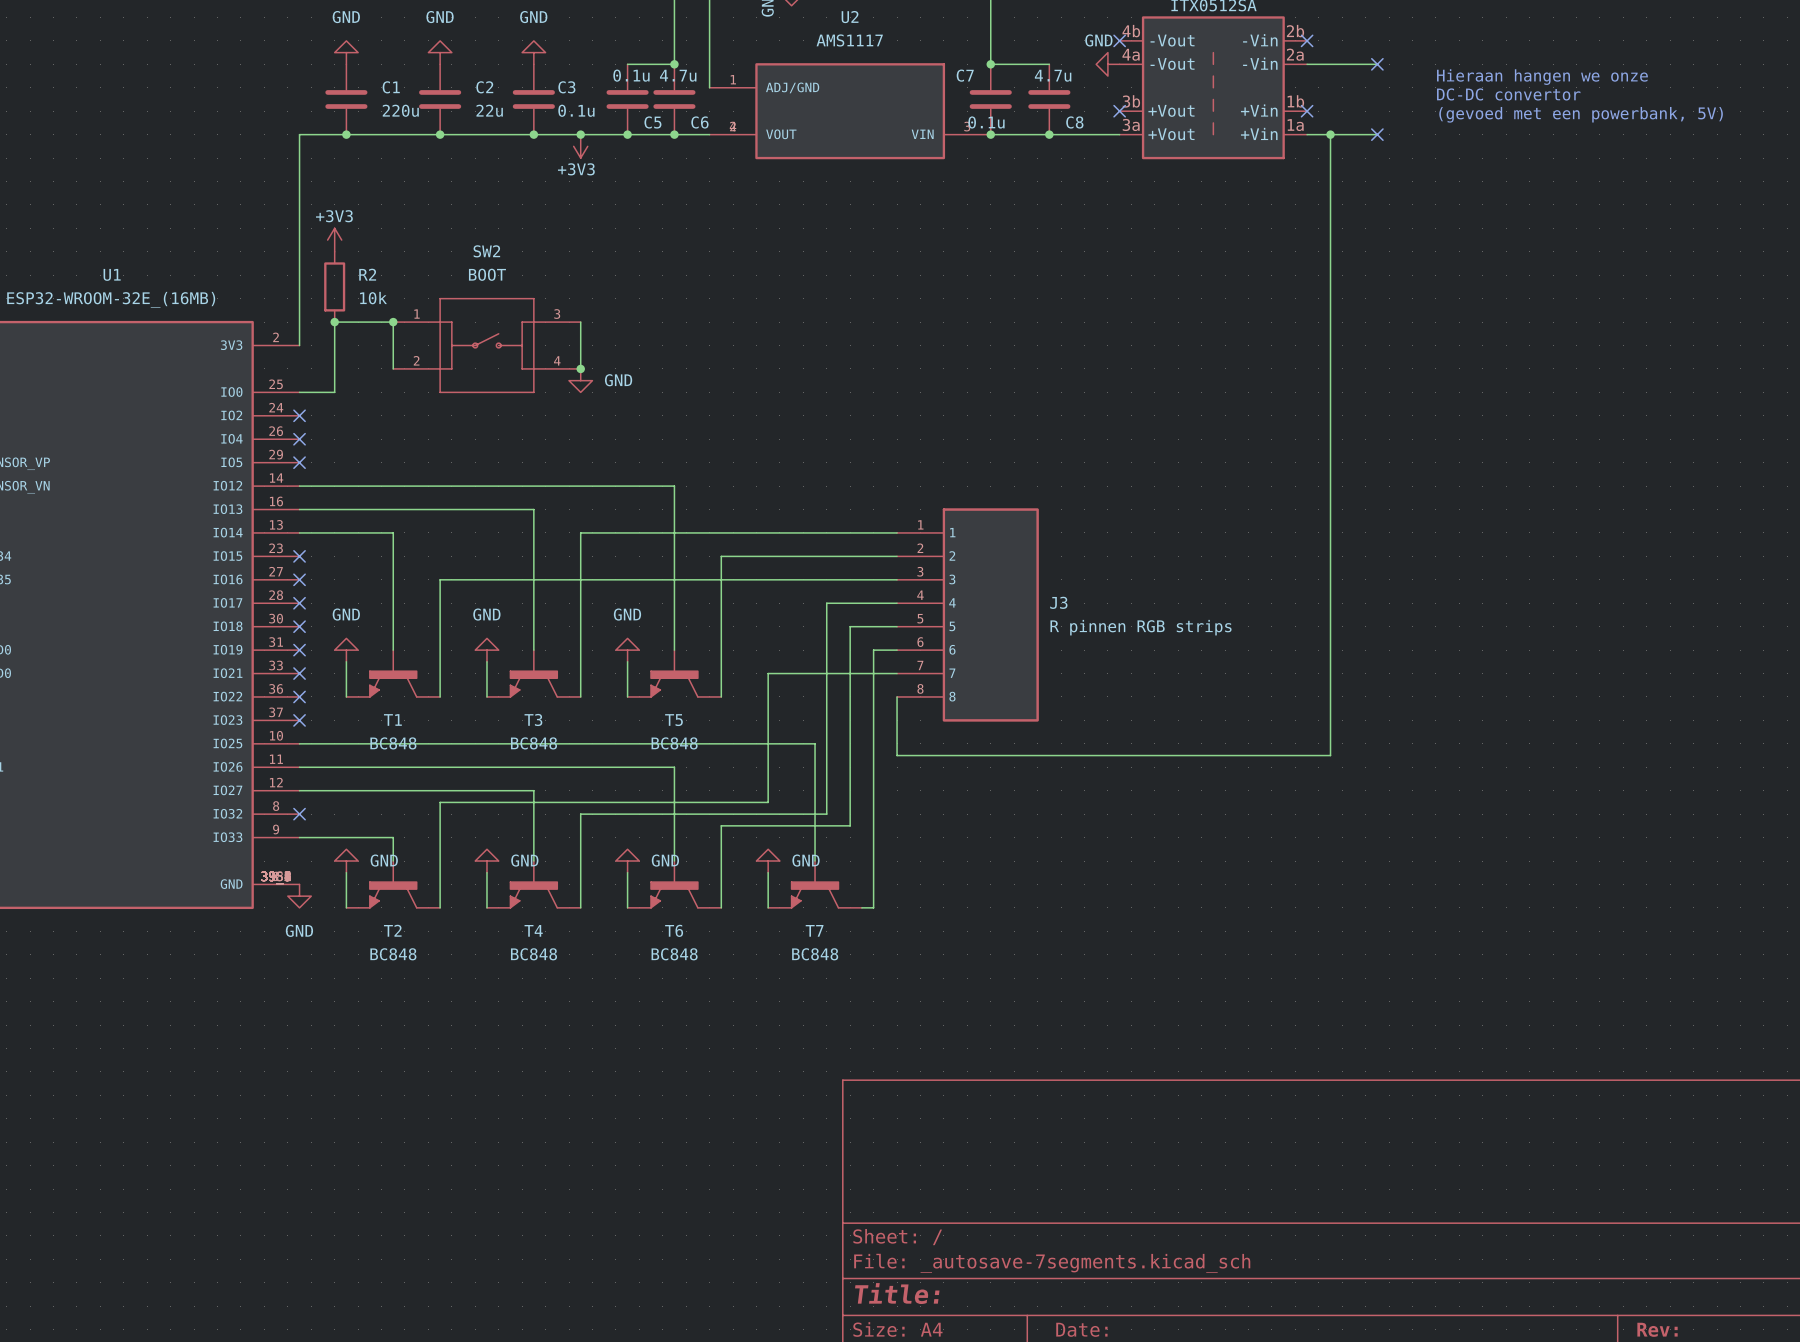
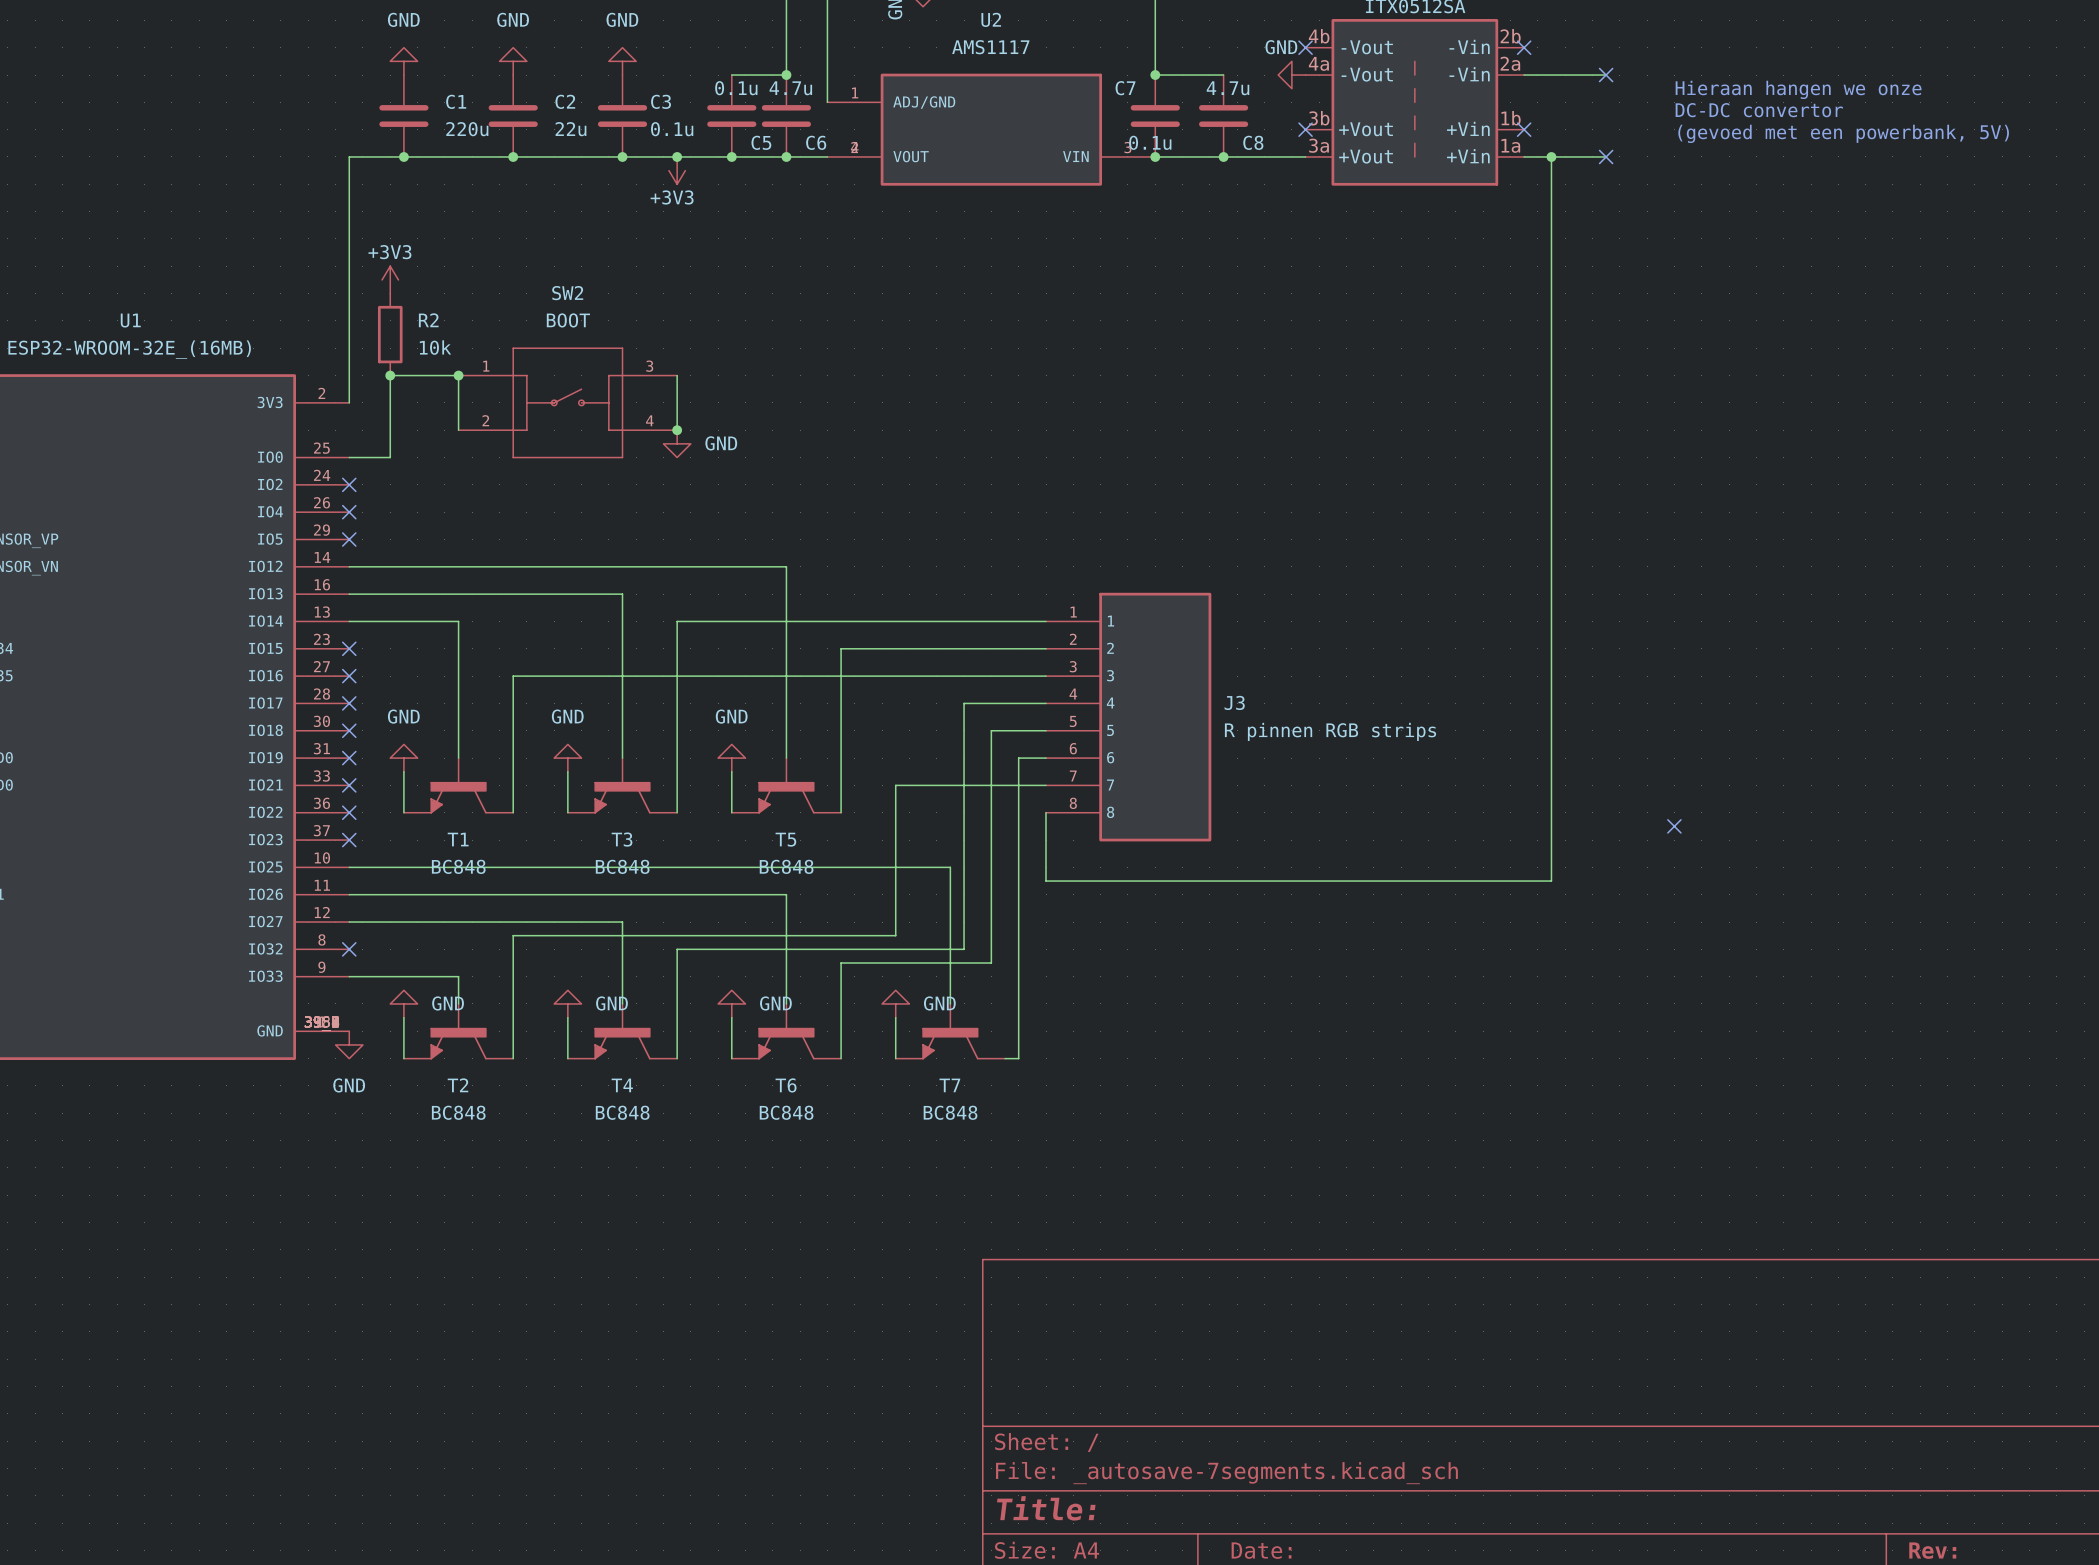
no-connect mark: none -> (1674, 826)

